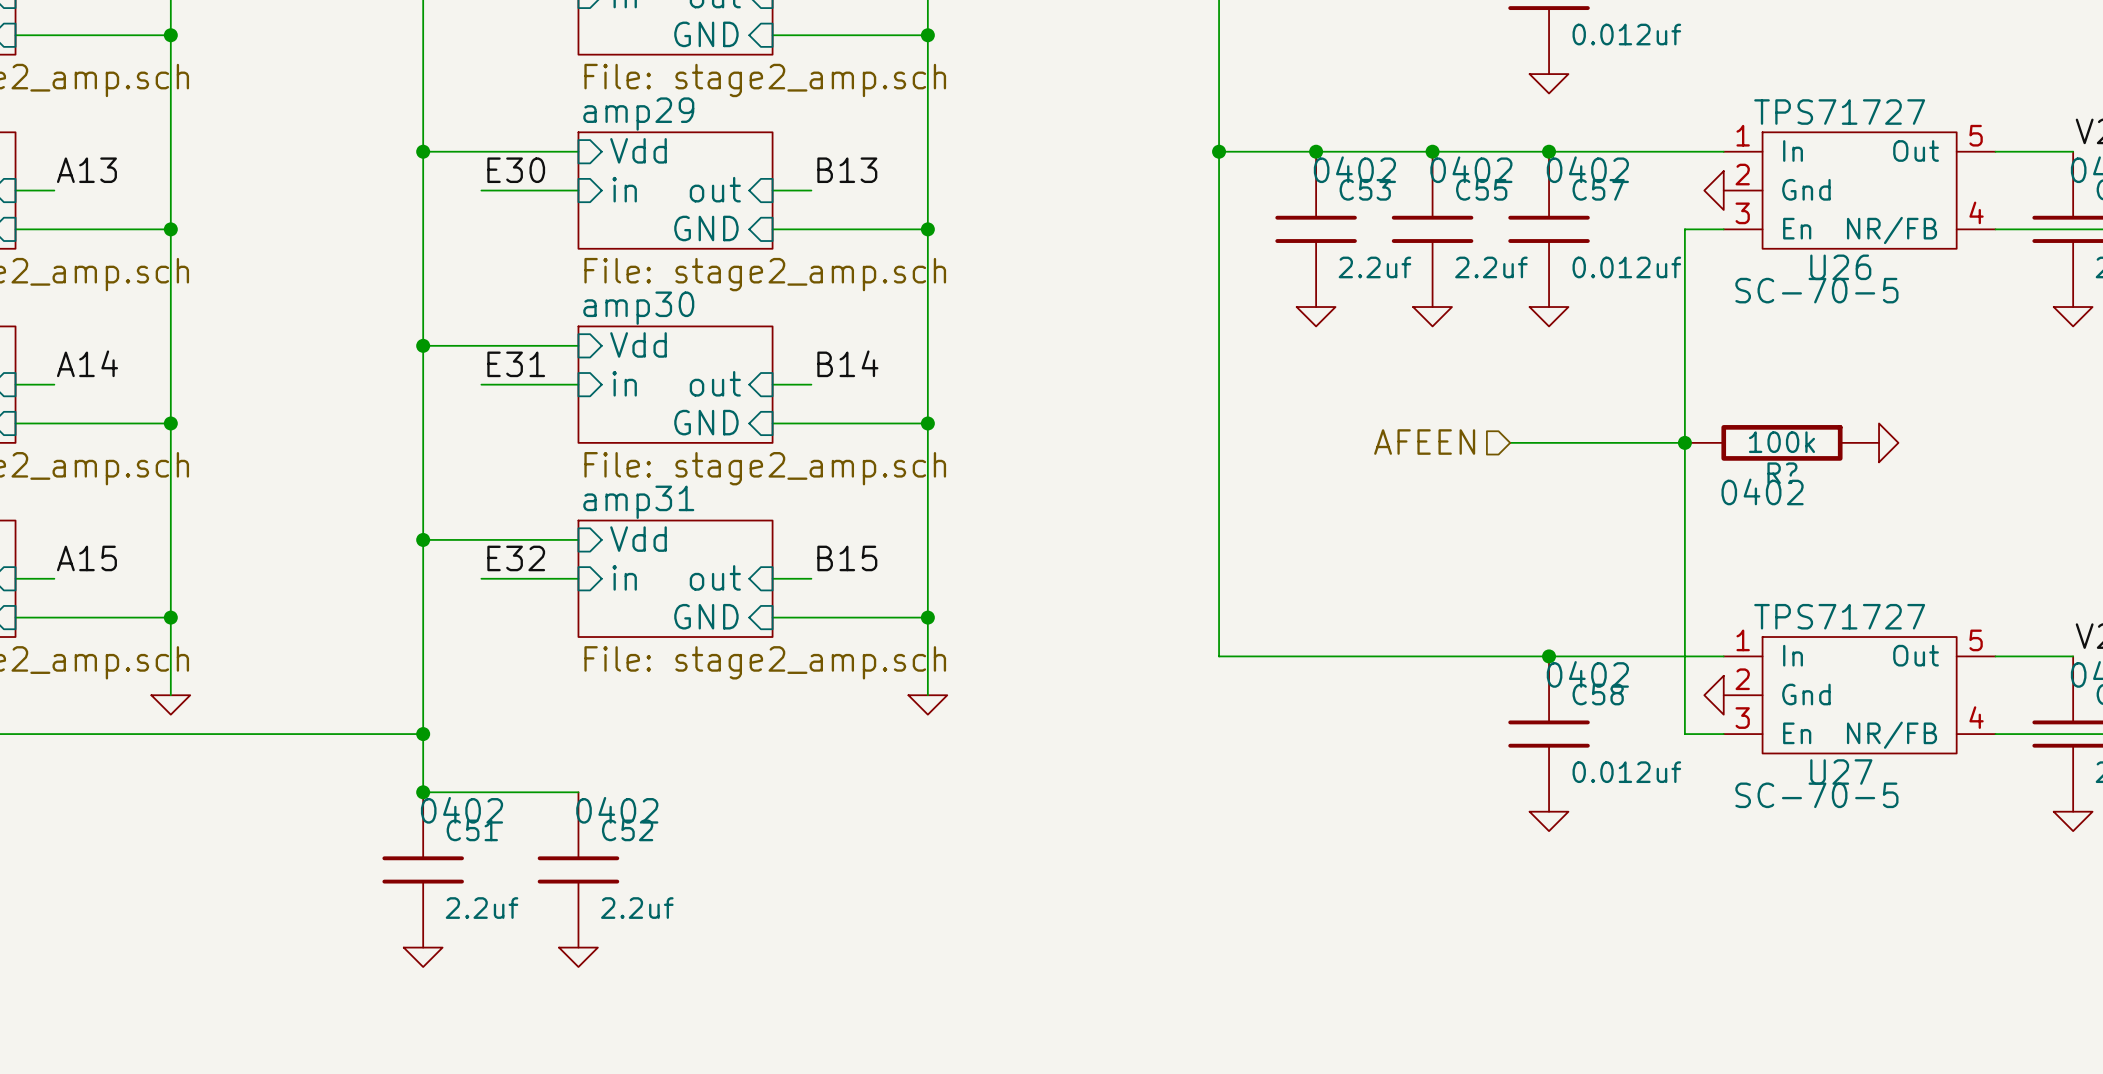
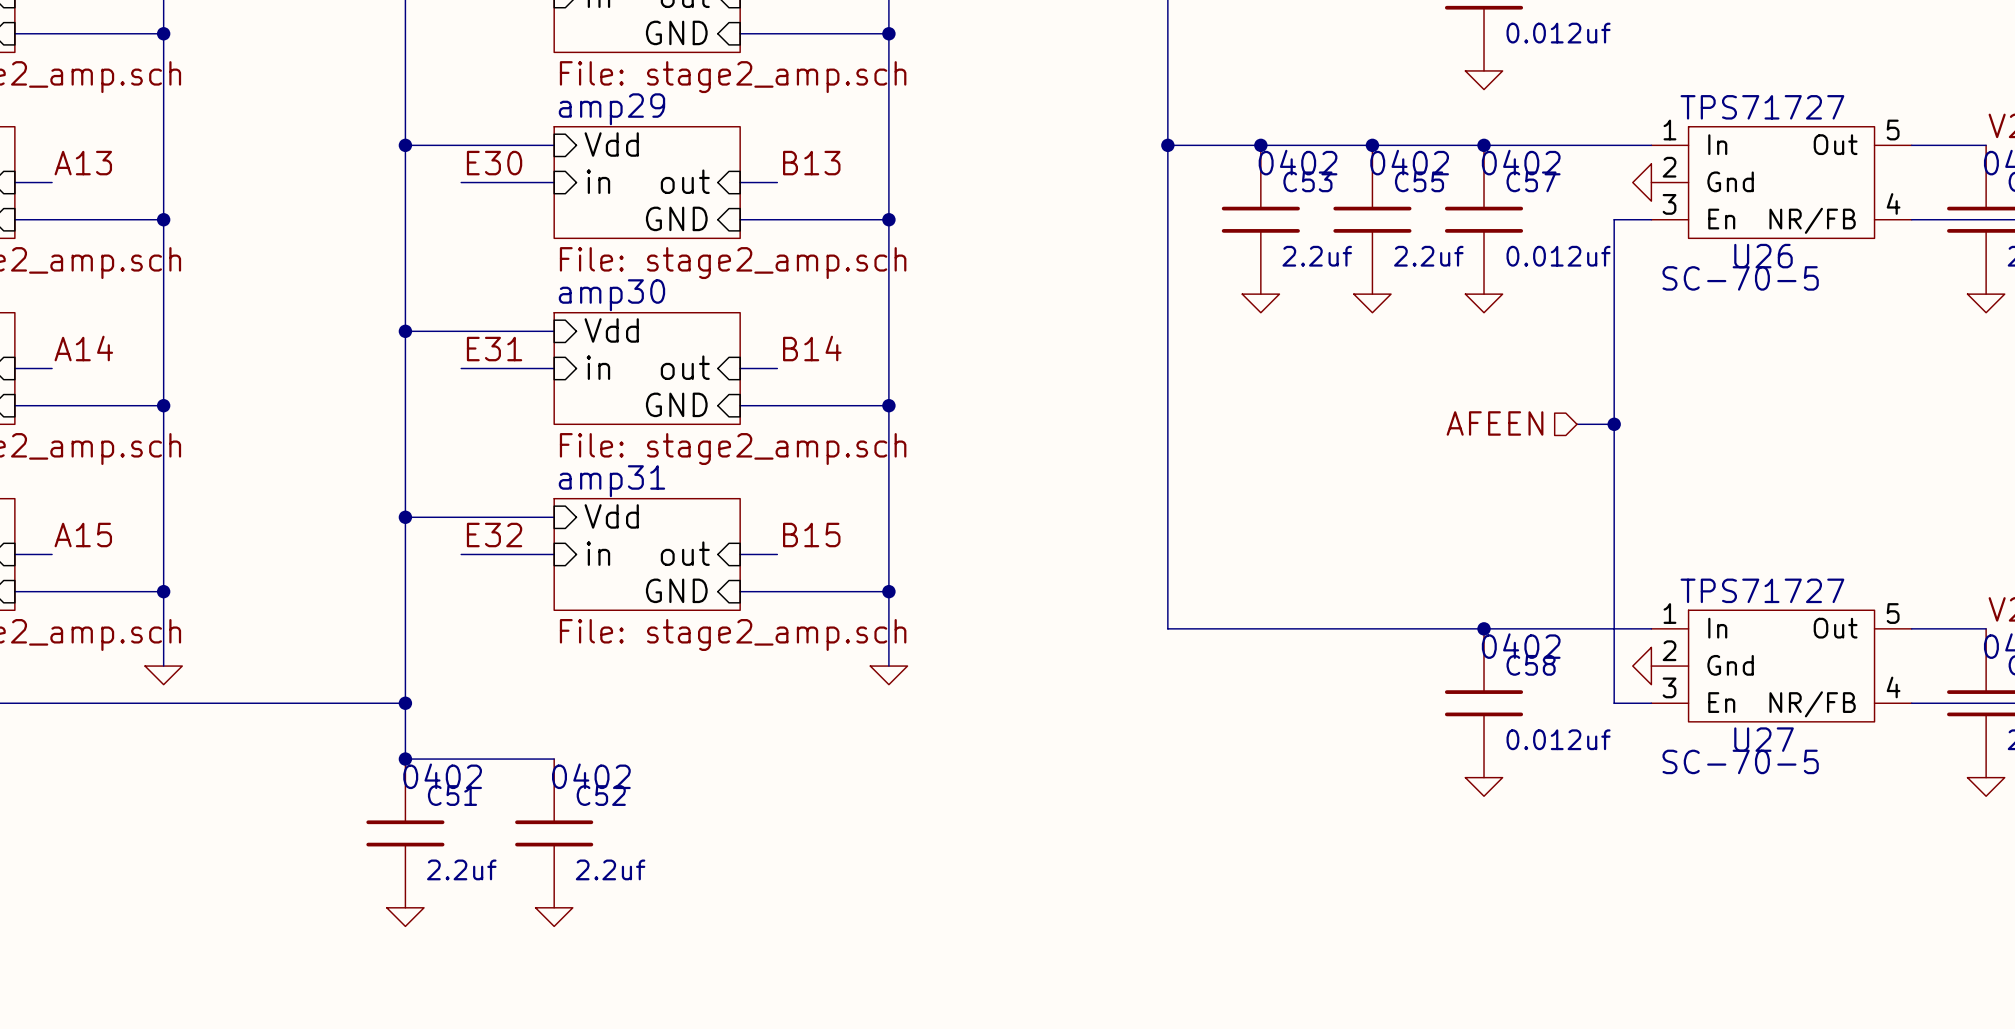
hierarchical label position: AFEEN (1424, 442) -> AFEEN (1495, 423)
wire: (1510, 442) (1646, 442) -> none
R?: 100k (1781, 442) -> none
power symbol: (1888, 442) -> none

